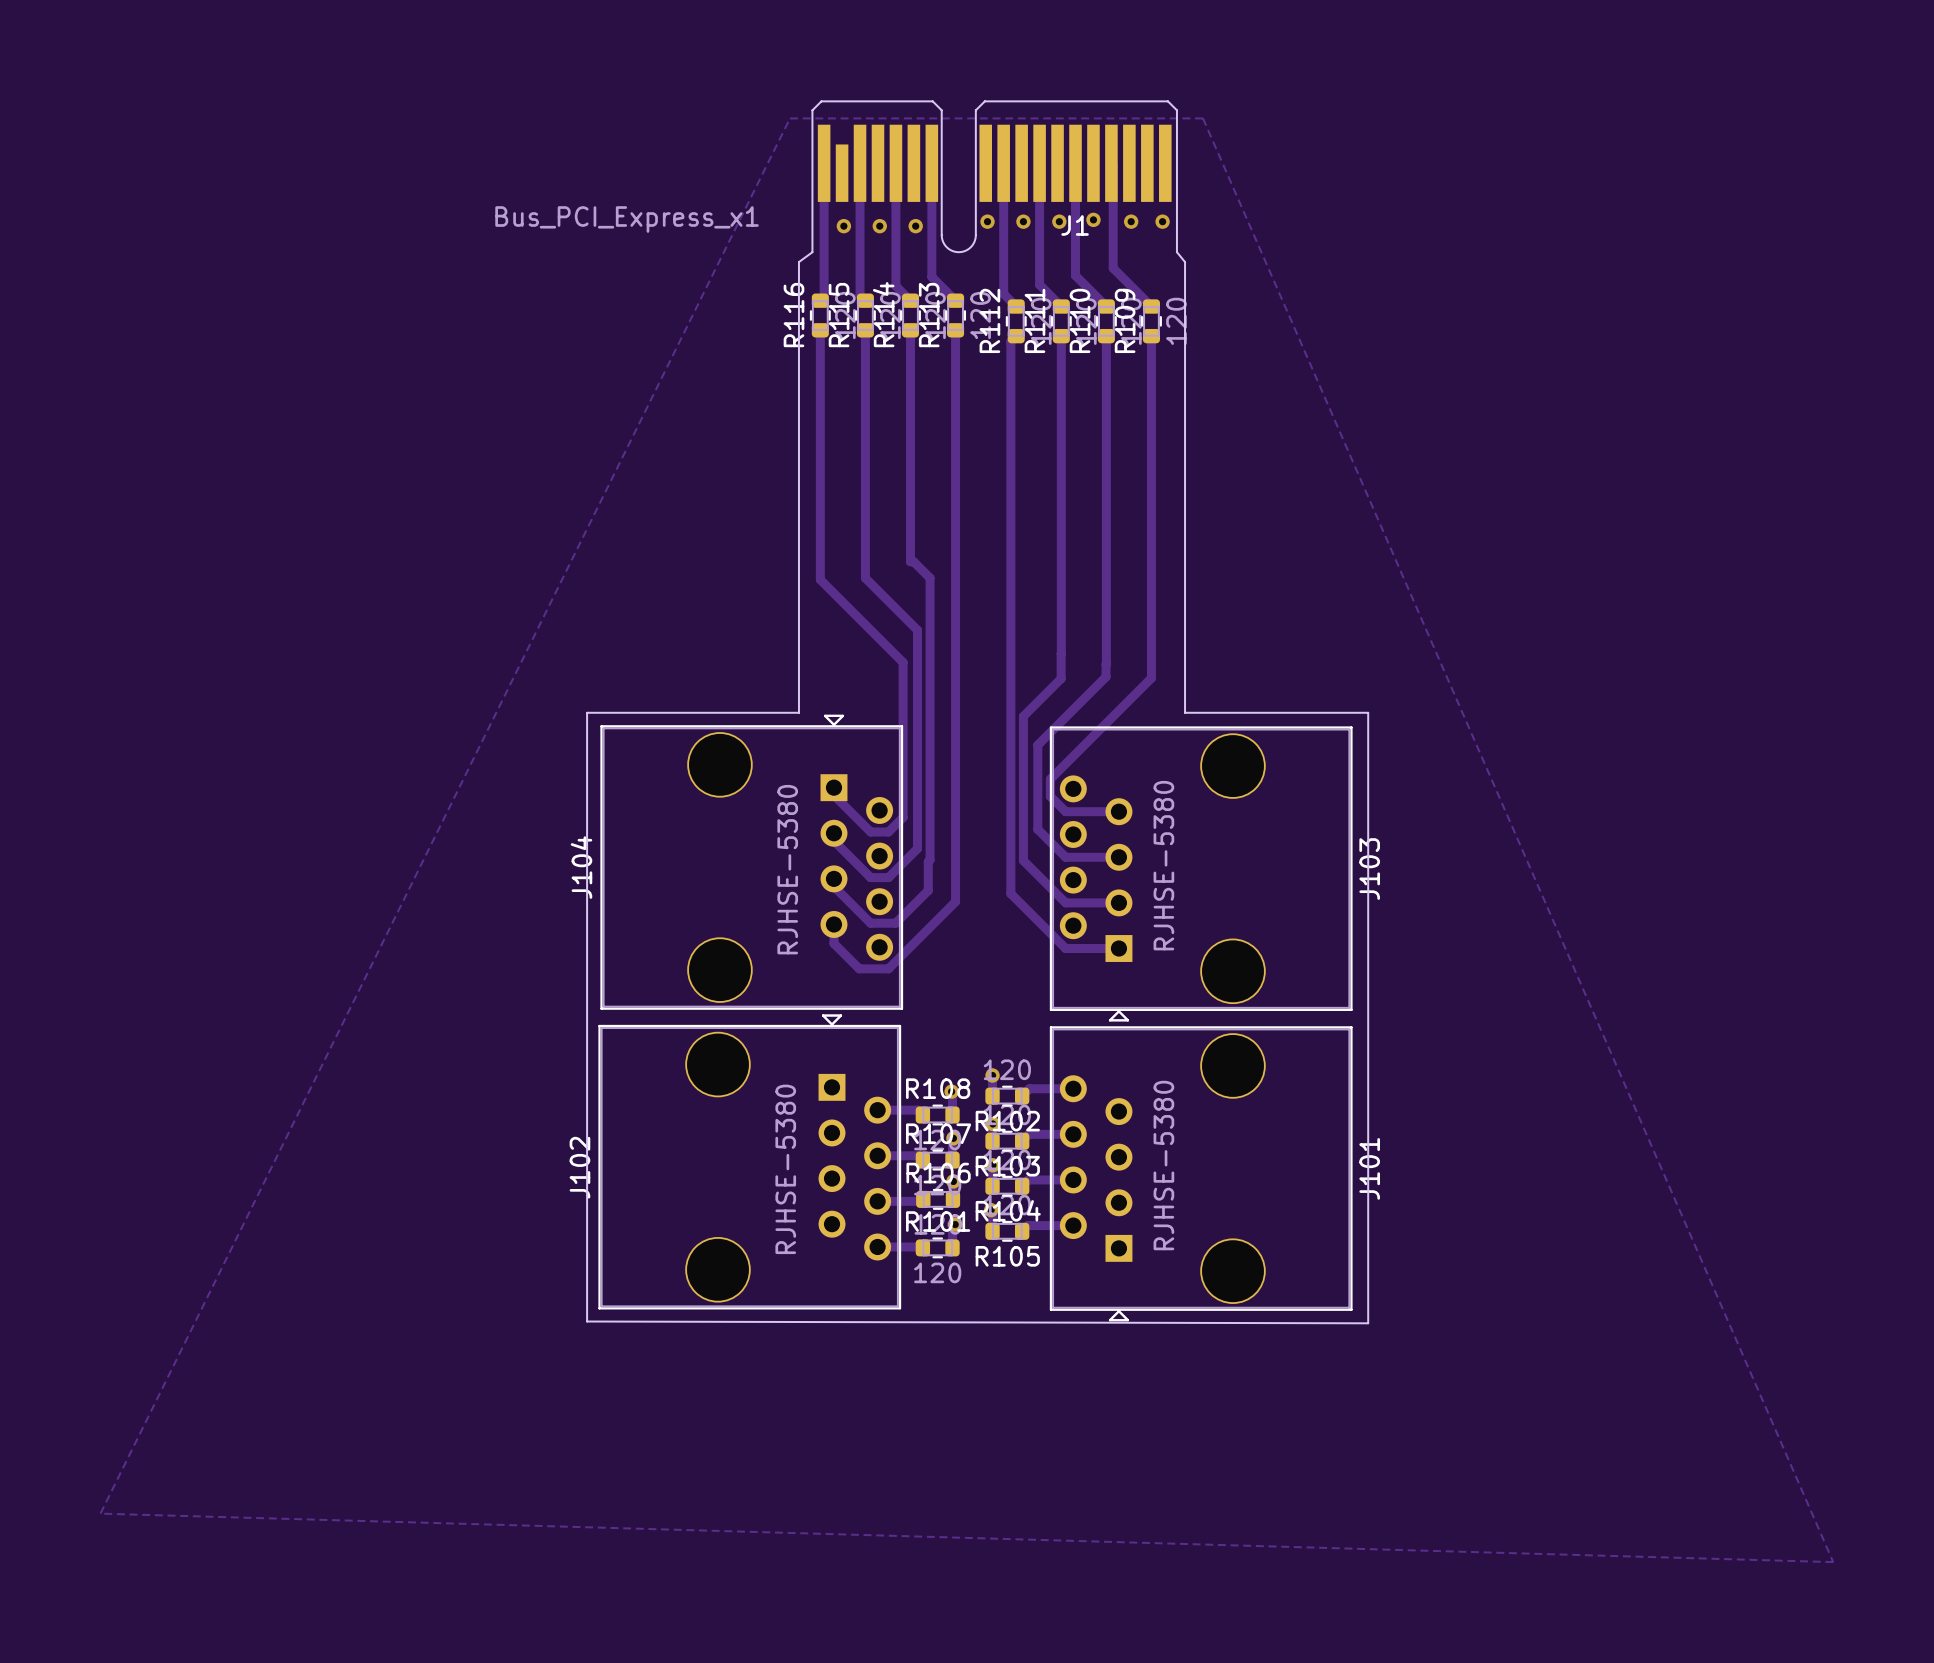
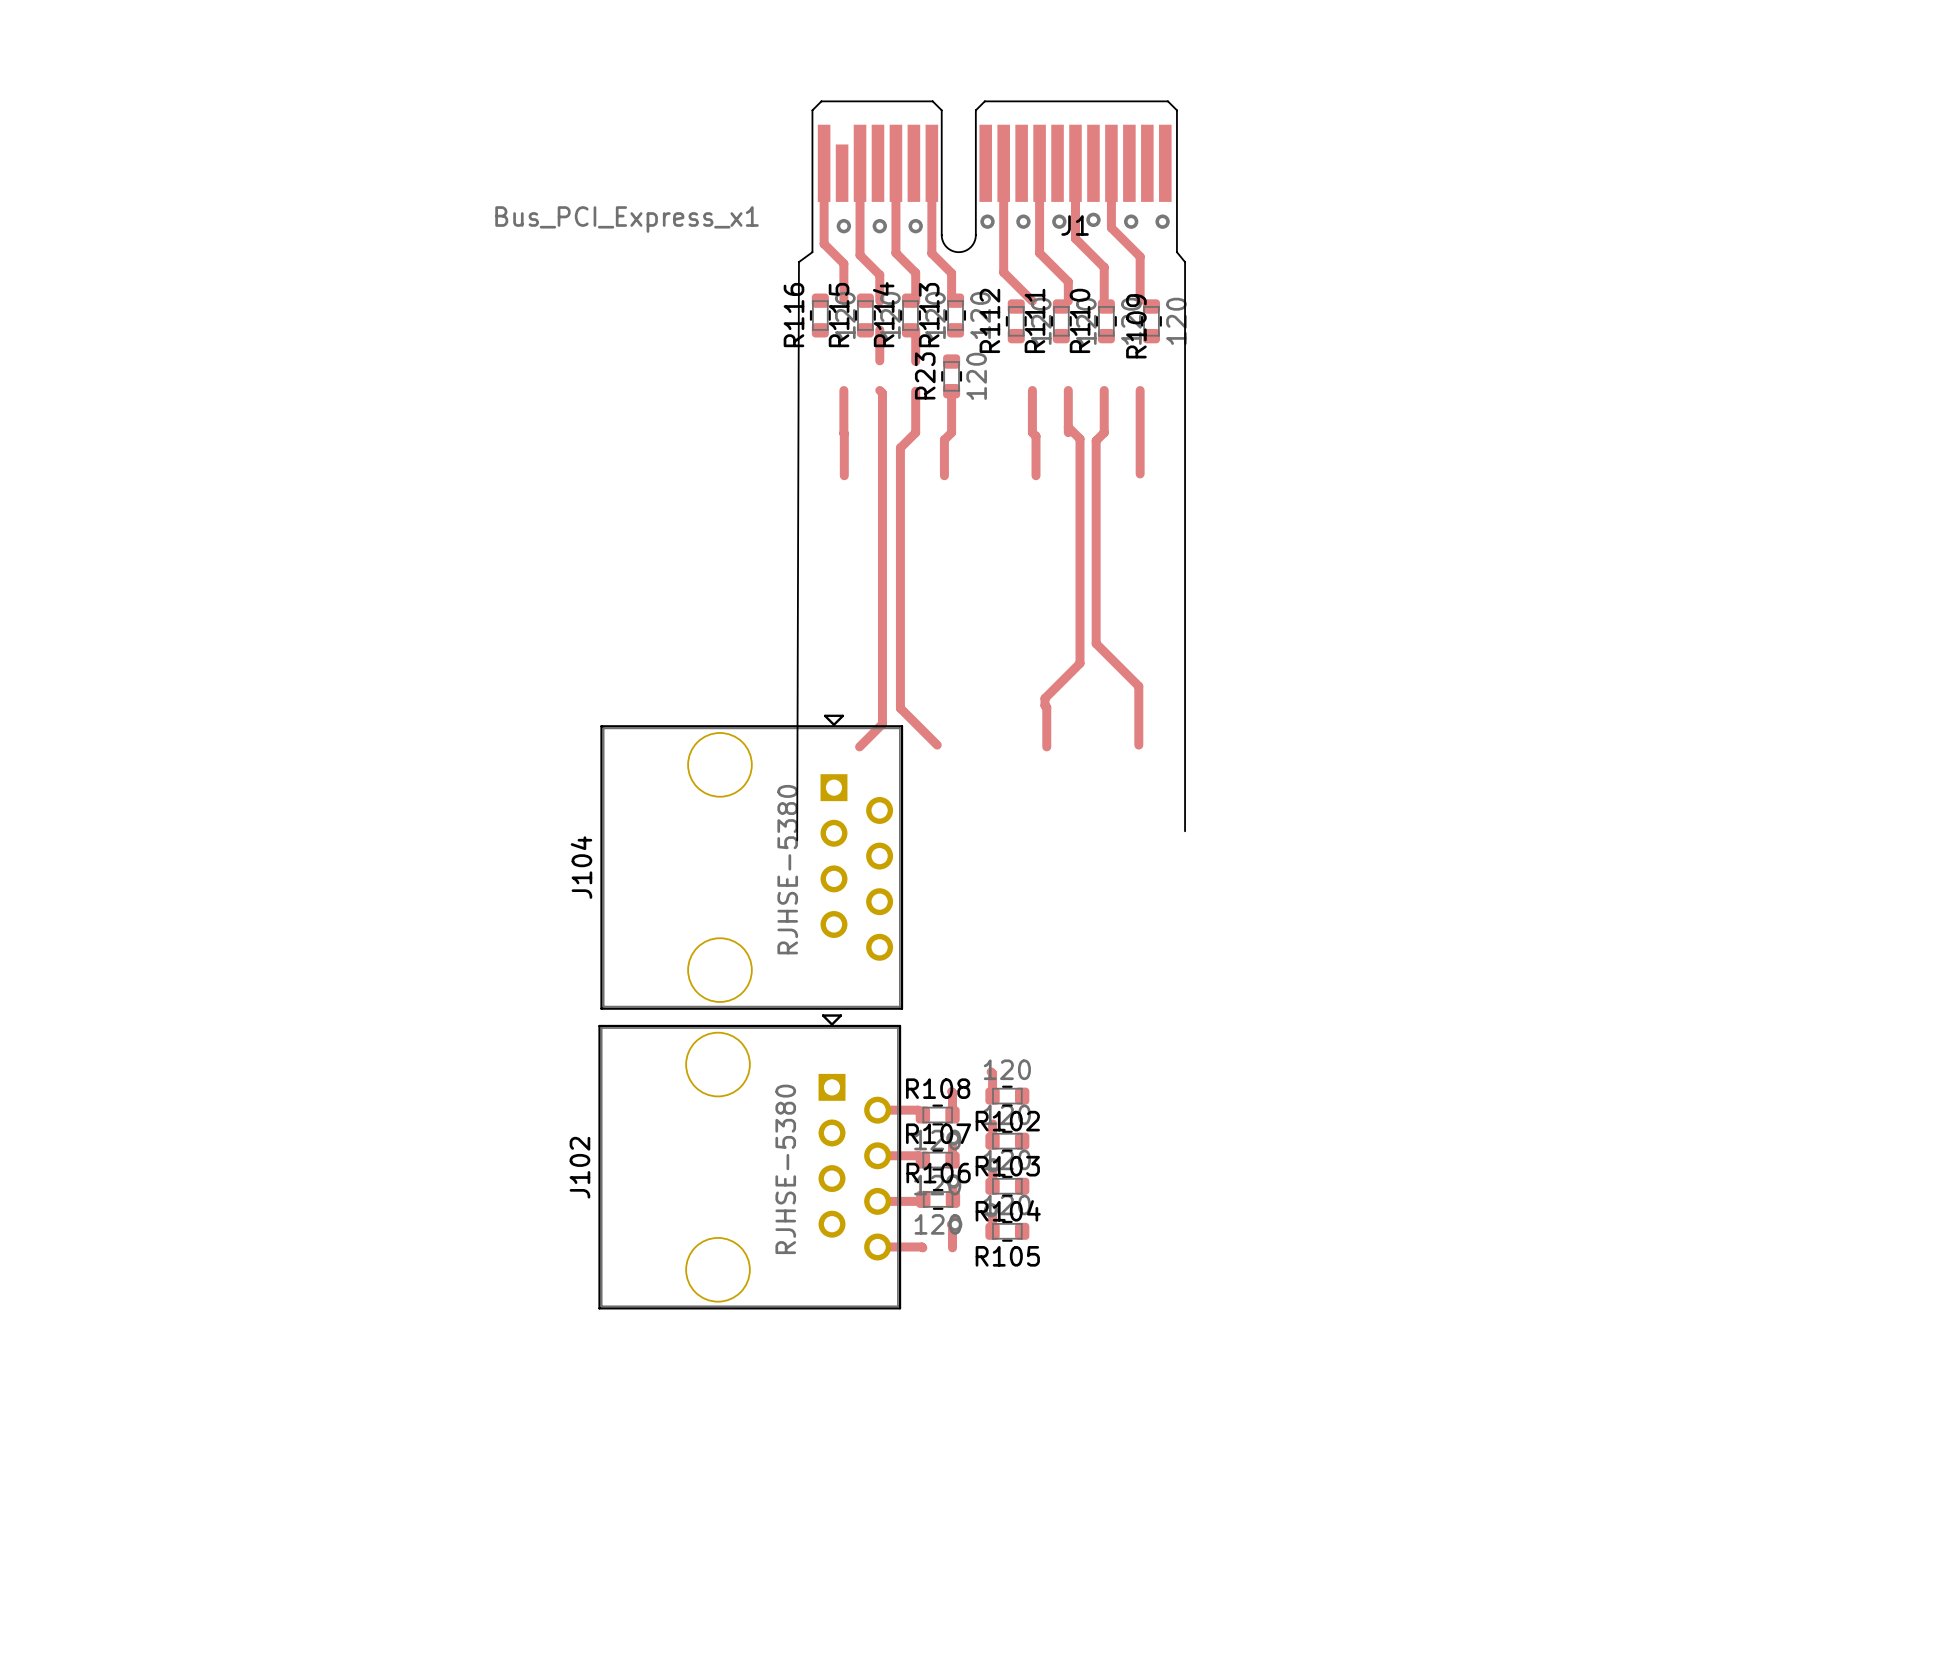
zone outline: (789, 118) (100, 1513) (1833, 1562) (1203, 118) (789, 118) -> none
track: (1111, 163) (1113, 165) (1113, 268) (1151, 306) -> (1111, 163) (1111, 227) (1140, 256) (1140, 300)
track: (1075, 238) (1075, 275) (1106, 306) -> (1075, 238) (1104, 267) (1104, 301)
track: (824, 243) (824, 296) (820, 300) -> (824, 243) (843, 263) (843, 300)
track: (895, 253) (895, 286) (910, 300) -> (895, 253) (915, 272) (915, 302)
track: (931, 253) (931, 276) (955, 300) -> (931, 253) (951, 273) (951, 301)
track: (1039, 253) (1039, 284) (1061, 306) -> (1039, 253) (1068, 281) (1068, 301)
track: (860, 255) (860, 295) (865, 300) -> (860, 255) (879, 275) (879, 301)
board edge: (798, 262) (798, 712) (587, 712) (587, 1321) (1368, 1323) (1368, 712) (1185, 712) -> (798, 262) (797, 840)
track: (1003, 272) (1003, 293) (1016, 306) -> (1003, 272) (1032, 301)
R109 name position: R109 (1125, 320) -> R109 (1136, 326)
track: none -> (879, 329) (879, 360)
track: none -> (915, 329) (915, 361)
track: (820, 330) (820, 579) (903, 662) (903, 817) (888, 832) (870, 832) (833, 795) (833, 787) -> none
track: (865, 330) (865, 578) (917, 630) (917, 848) (888, 877) (870, 877) (833, 840) (833, 833) -> none
track: (910, 330) (910, 561) (913, 561) (930, 578) (930, 860) (928, 861) (928, 890) (895, 923) (870, 923) (833, 886) (833, 878) -> none
track: (955, 330) (955, 901) (888, 968) (859, 968) (833, 943) (833, 924) -> none
track: (1016, 336) (1010, 341) (1010, 893) (1065, 948) (1118, 948) -> none
track: (1061, 336) (1061, 653) -> none
track: (1106, 336) (1106, 676) (1037, 745) (1037, 829) (1065, 857) (1118, 857) -> none
track: (1151, 336) (1151, 678) (1050, 779) (1050, 796) (1065, 811) (1118, 811) -> none
R23: none -> 120 (951, 376)
track: none -> (843, 390) (844, 475)
track: none -> (879, 390) (882, 393) (882, 724) (859, 746)
track: none -> (1032, 390) (1032, 432) (1036, 436) (1036, 475)
track: none -> (1068, 390) (1068, 432)
track: none -> (1104, 390) (1104, 432) (1096, 440) (1096, 643) (1138, 686) (1138, 745)
track: none -> (1140, 390) (1140, 473)
track: none -> (915, 391) (915, 432) (900, 447) (900, 708) (937, 745)
track: none -> (951, 391) (951, 432) (944, 439) (944, 475)
track: none -> (1068, 427) (1079, 438) (1079, 663) (1044, 698) (1046, 746)
track: (1061, 653) (1061, 678) (1023, 716) (1023, 860) (1065, 902) (1118, 902) -> none
board edge: none -> (1185, 712) (1185, 831)
J103: RJHSE-5380 (1201, 873) -> none
via: (992, 1075) -> none
track: (1073, 1088) (1029, 1088) (1022, 1096) -> none
via: (951, 1091) -> none
via: (992, 1123) -> none
track: (1073, 1134) (1029, 1134) (1022, 1141) -> none
J101: RJHSE-5380 (1201, 1173) -> none
track: (1073, 1179) (1028, 1179) (1022, 1186) -> none
track: (1073, 1225) (1027, 1225) (1022, 1231) -> none
R101: 120 (937, 1247) -> none

